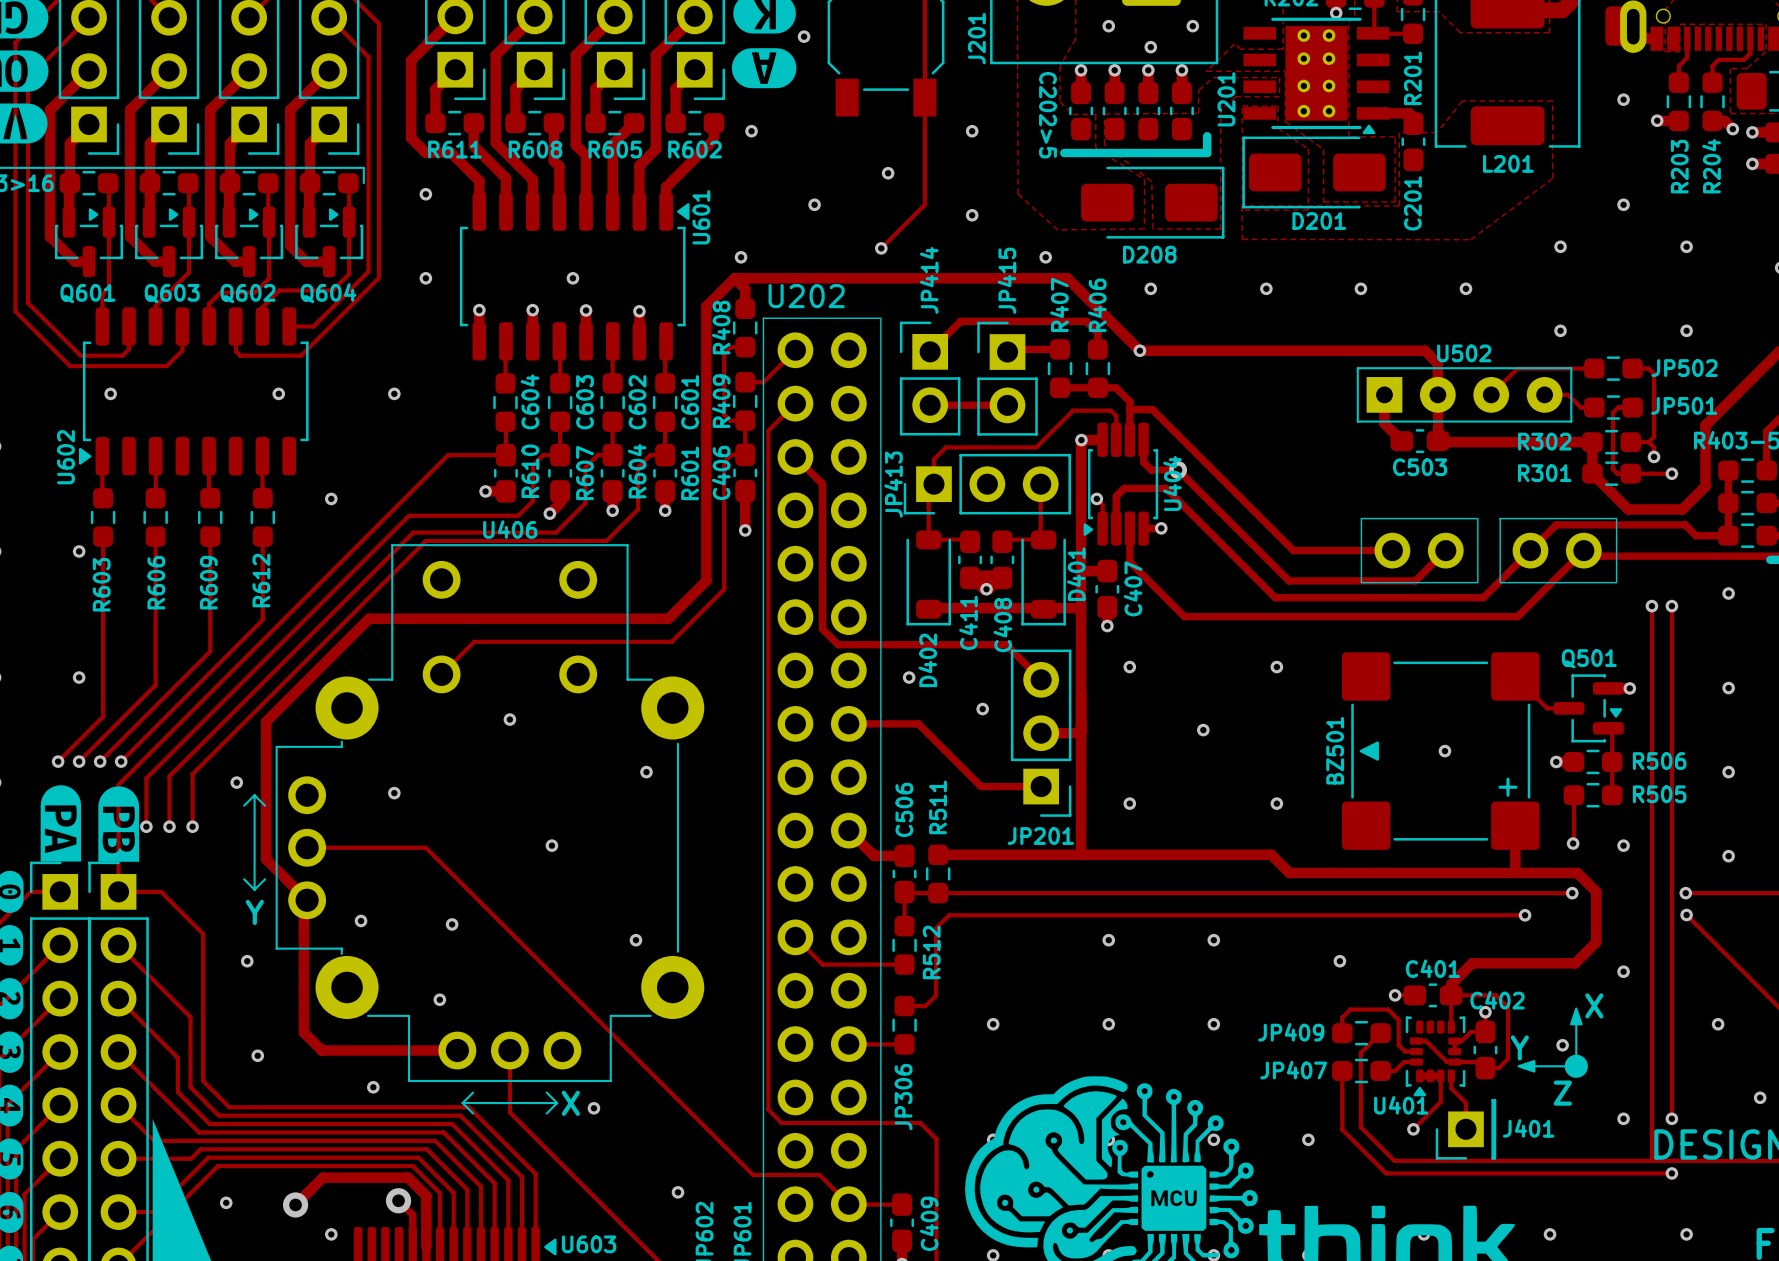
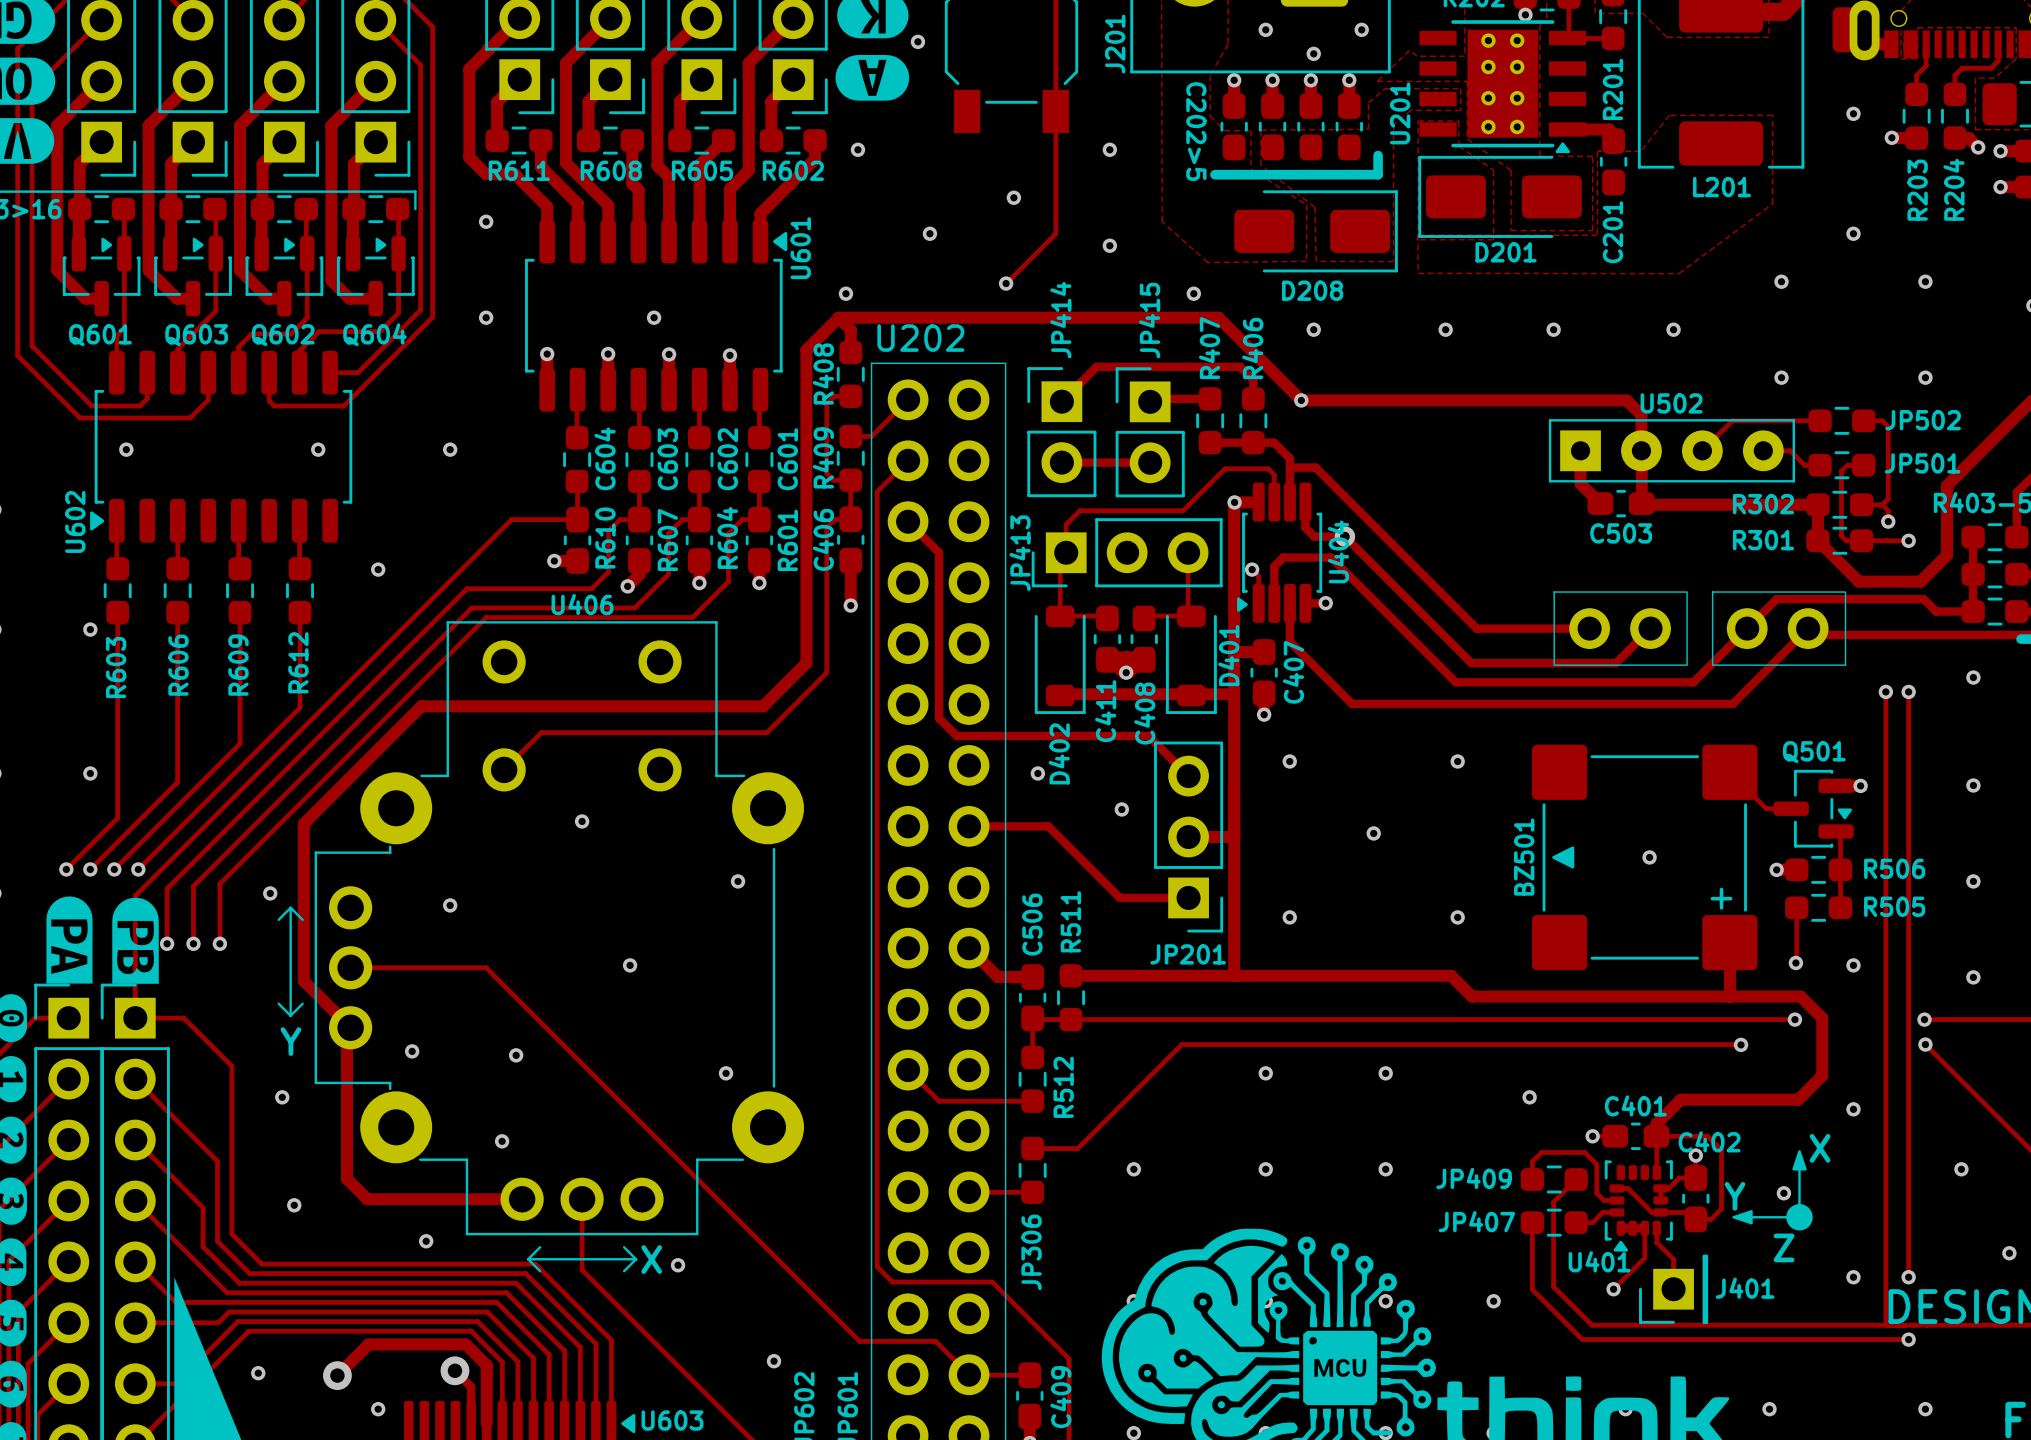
track: (1525, 915) (949, 915) (936, 928) (936, 995) (925, 1006) -> (1741, 1044) (1181, 1044) (1077, 1148) (1056, 1148)
track: (869, 1123) (920, 1123) (936, 1139) (936, 1190) -> (992, 1282) (1069, 1358)

